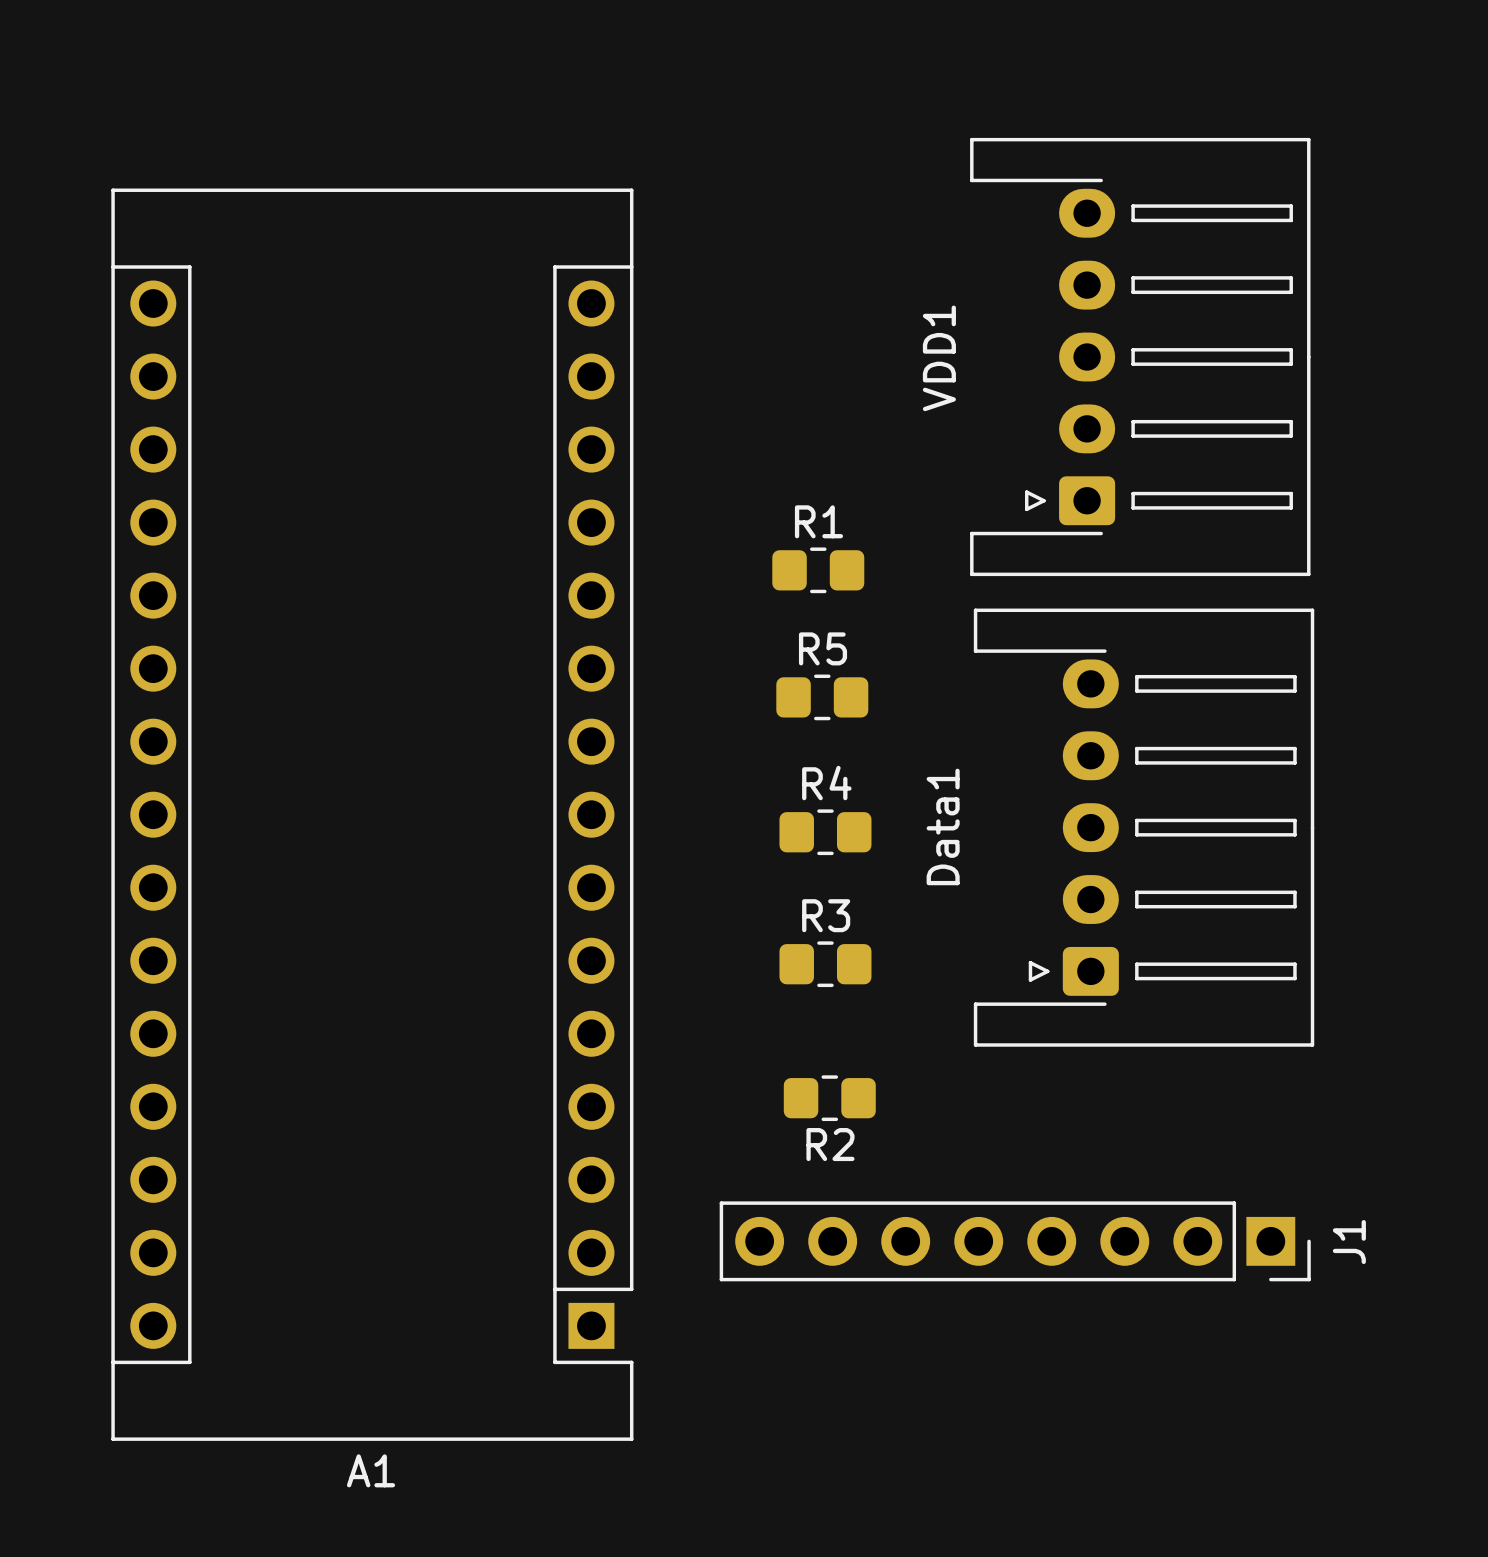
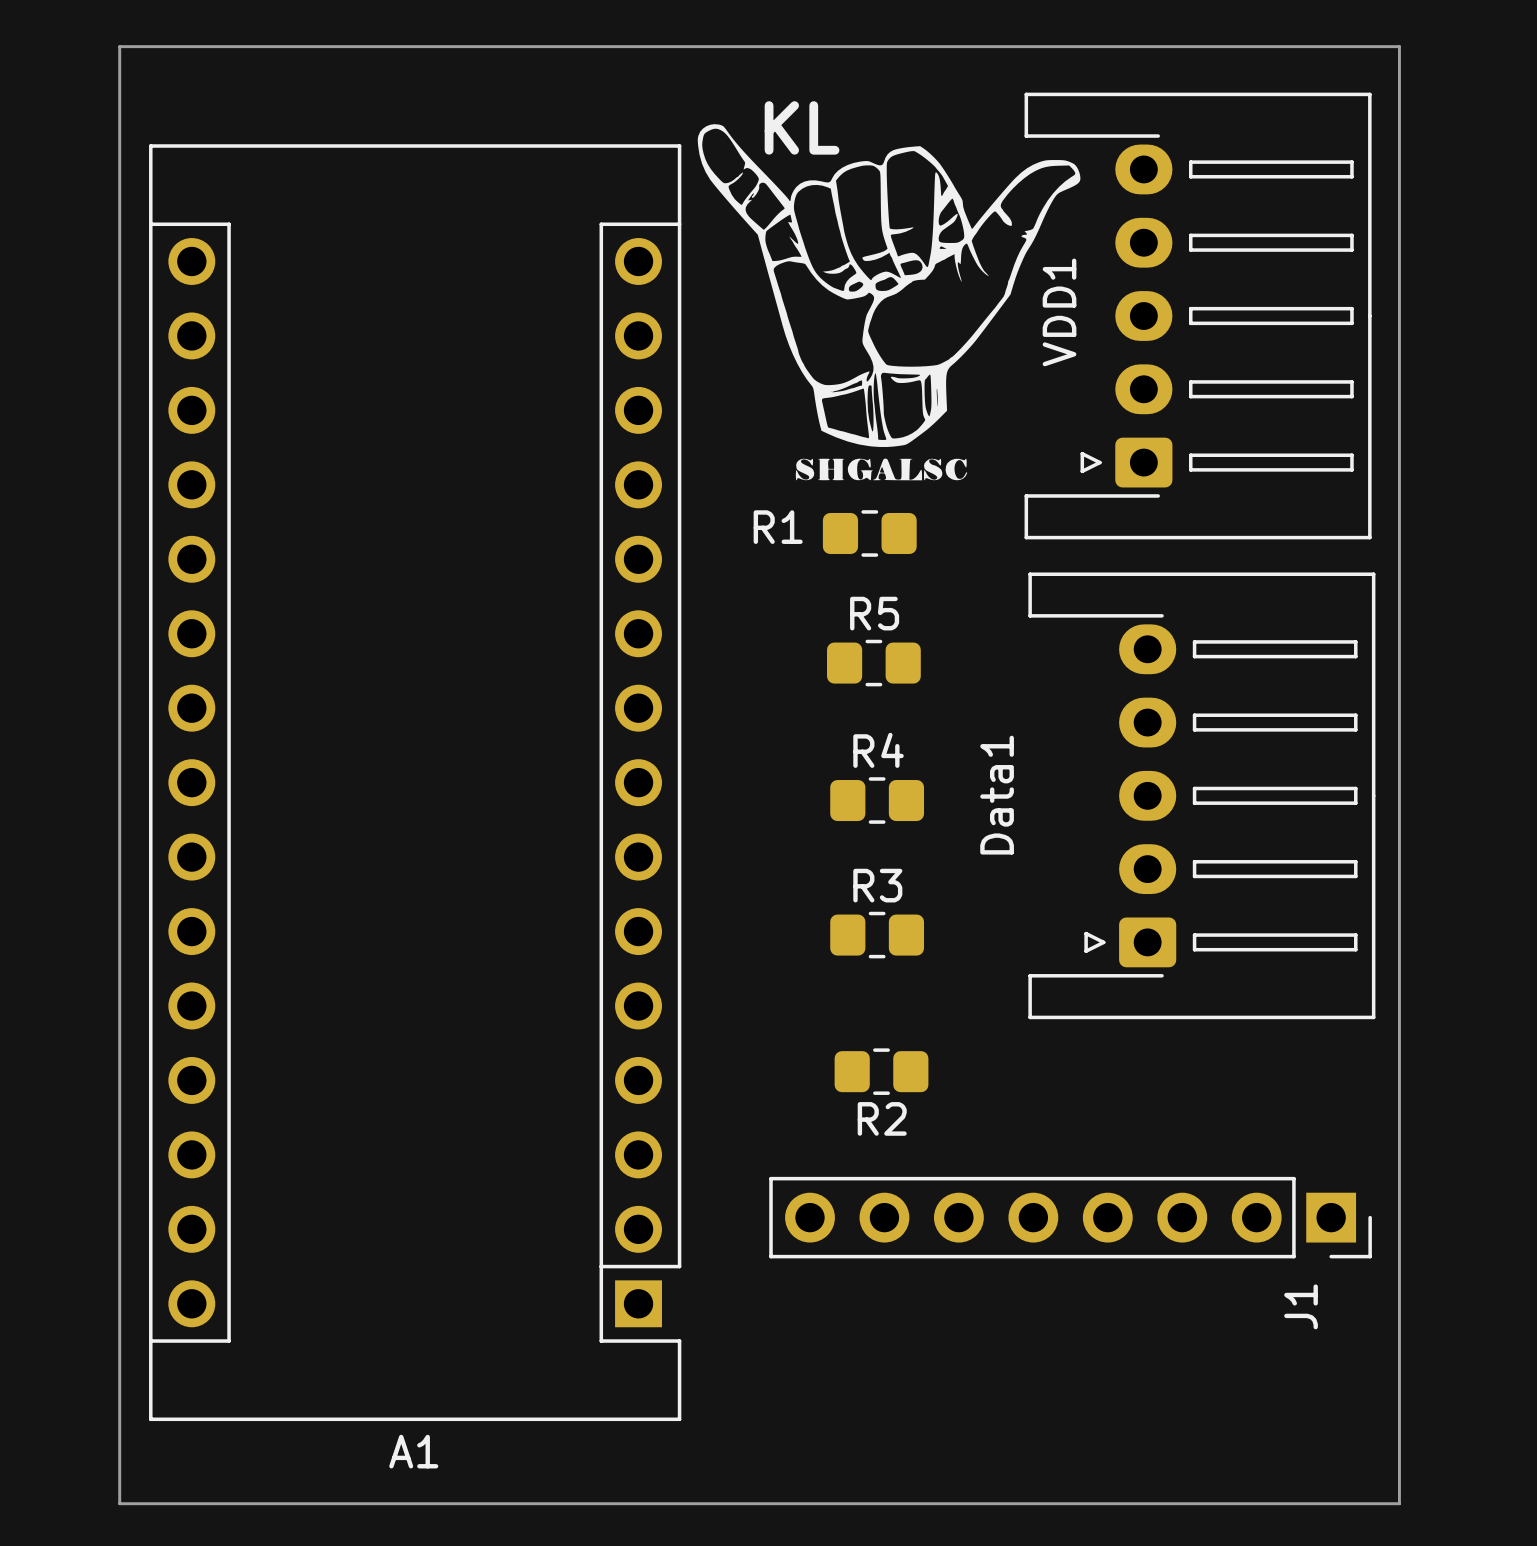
board edge: none -> (119, 46) (1399, 46) (1399, 1503) (119, 1503) (119, 46)
KL: none -> (889, 302)
VDD1 name position: VDD1 (939, 358) -> VDD1 (1059, 312)
R1 name position: R1 (818, 521) -> R1 (778, 527)
J1 name position: J1 (1349, 1242) -> J1 (1301, 1306)

